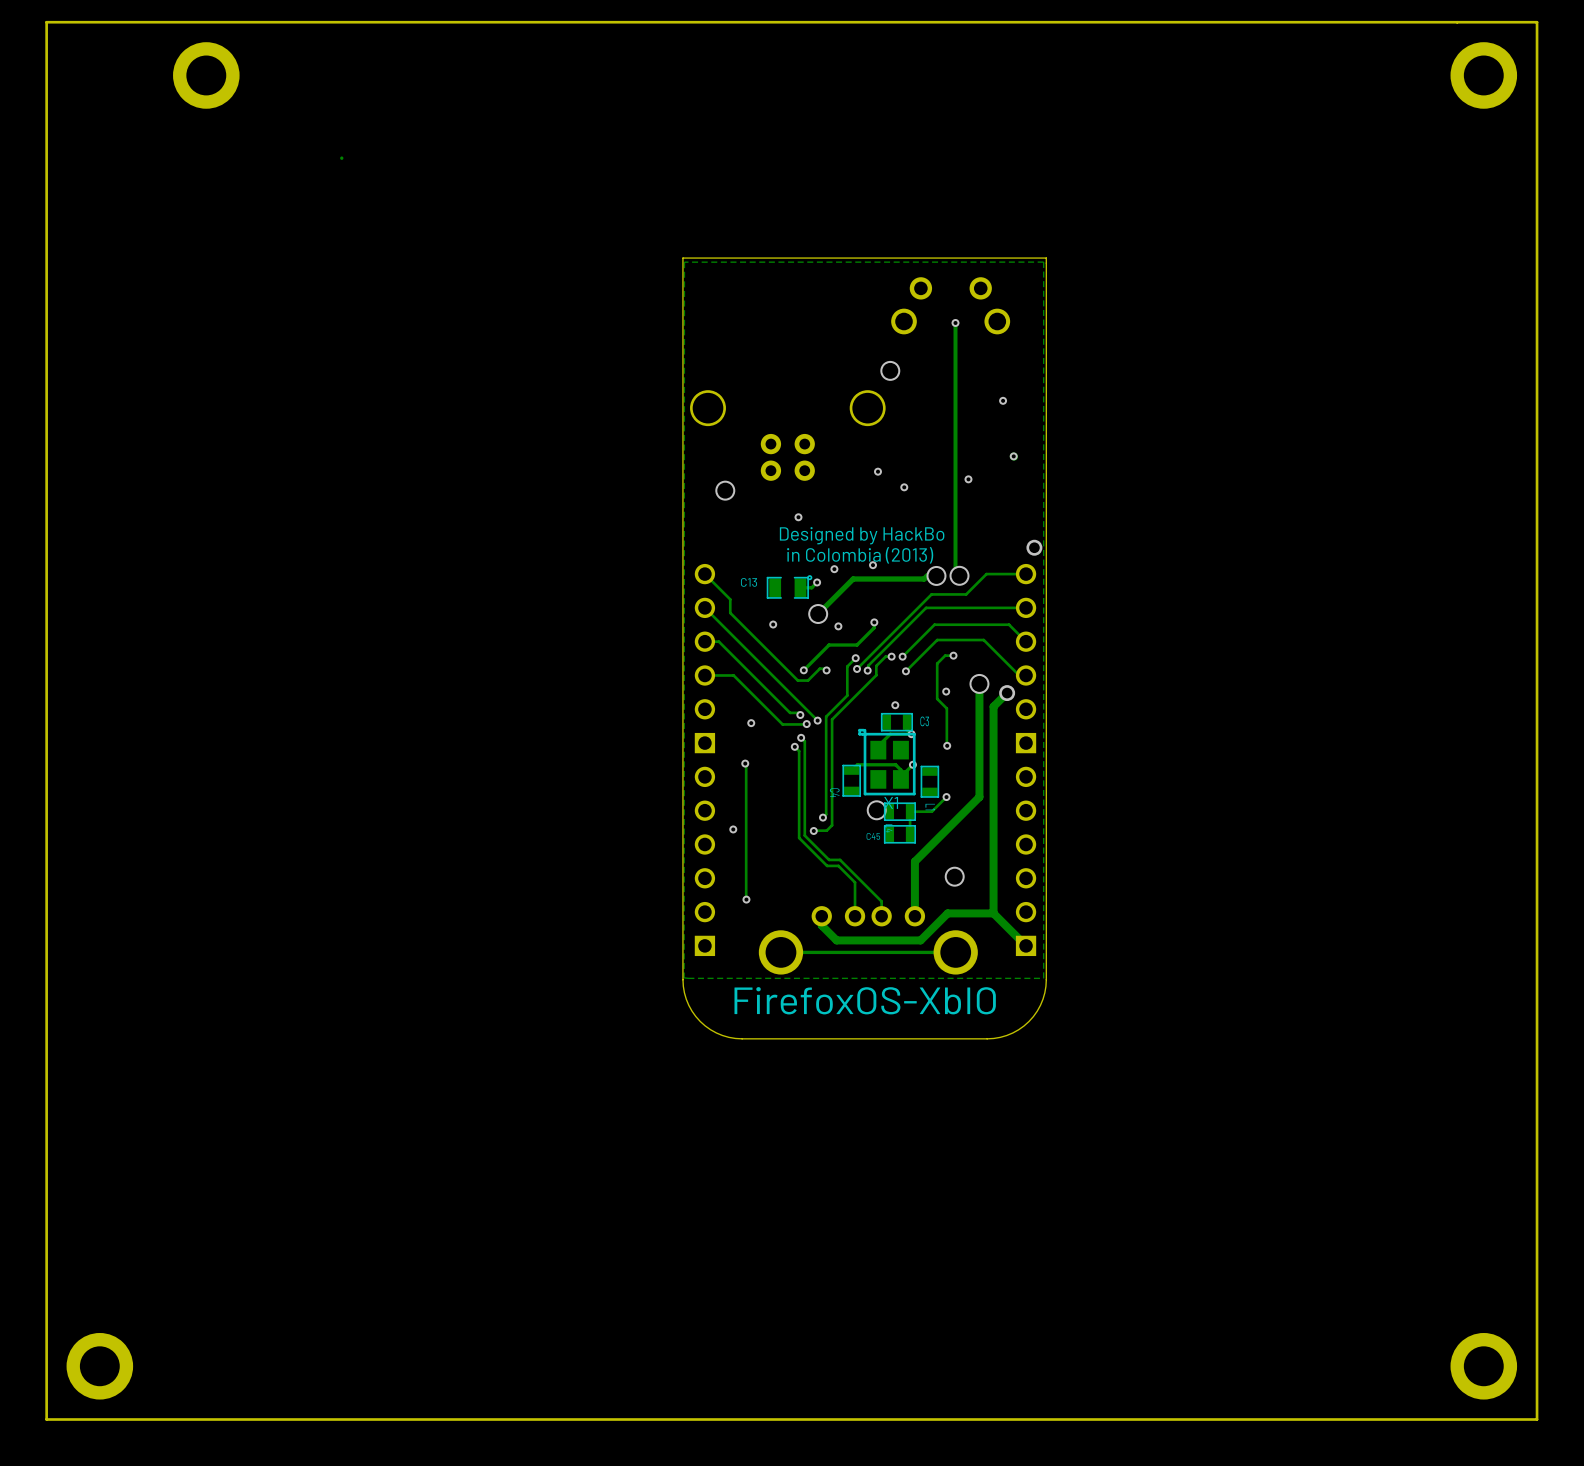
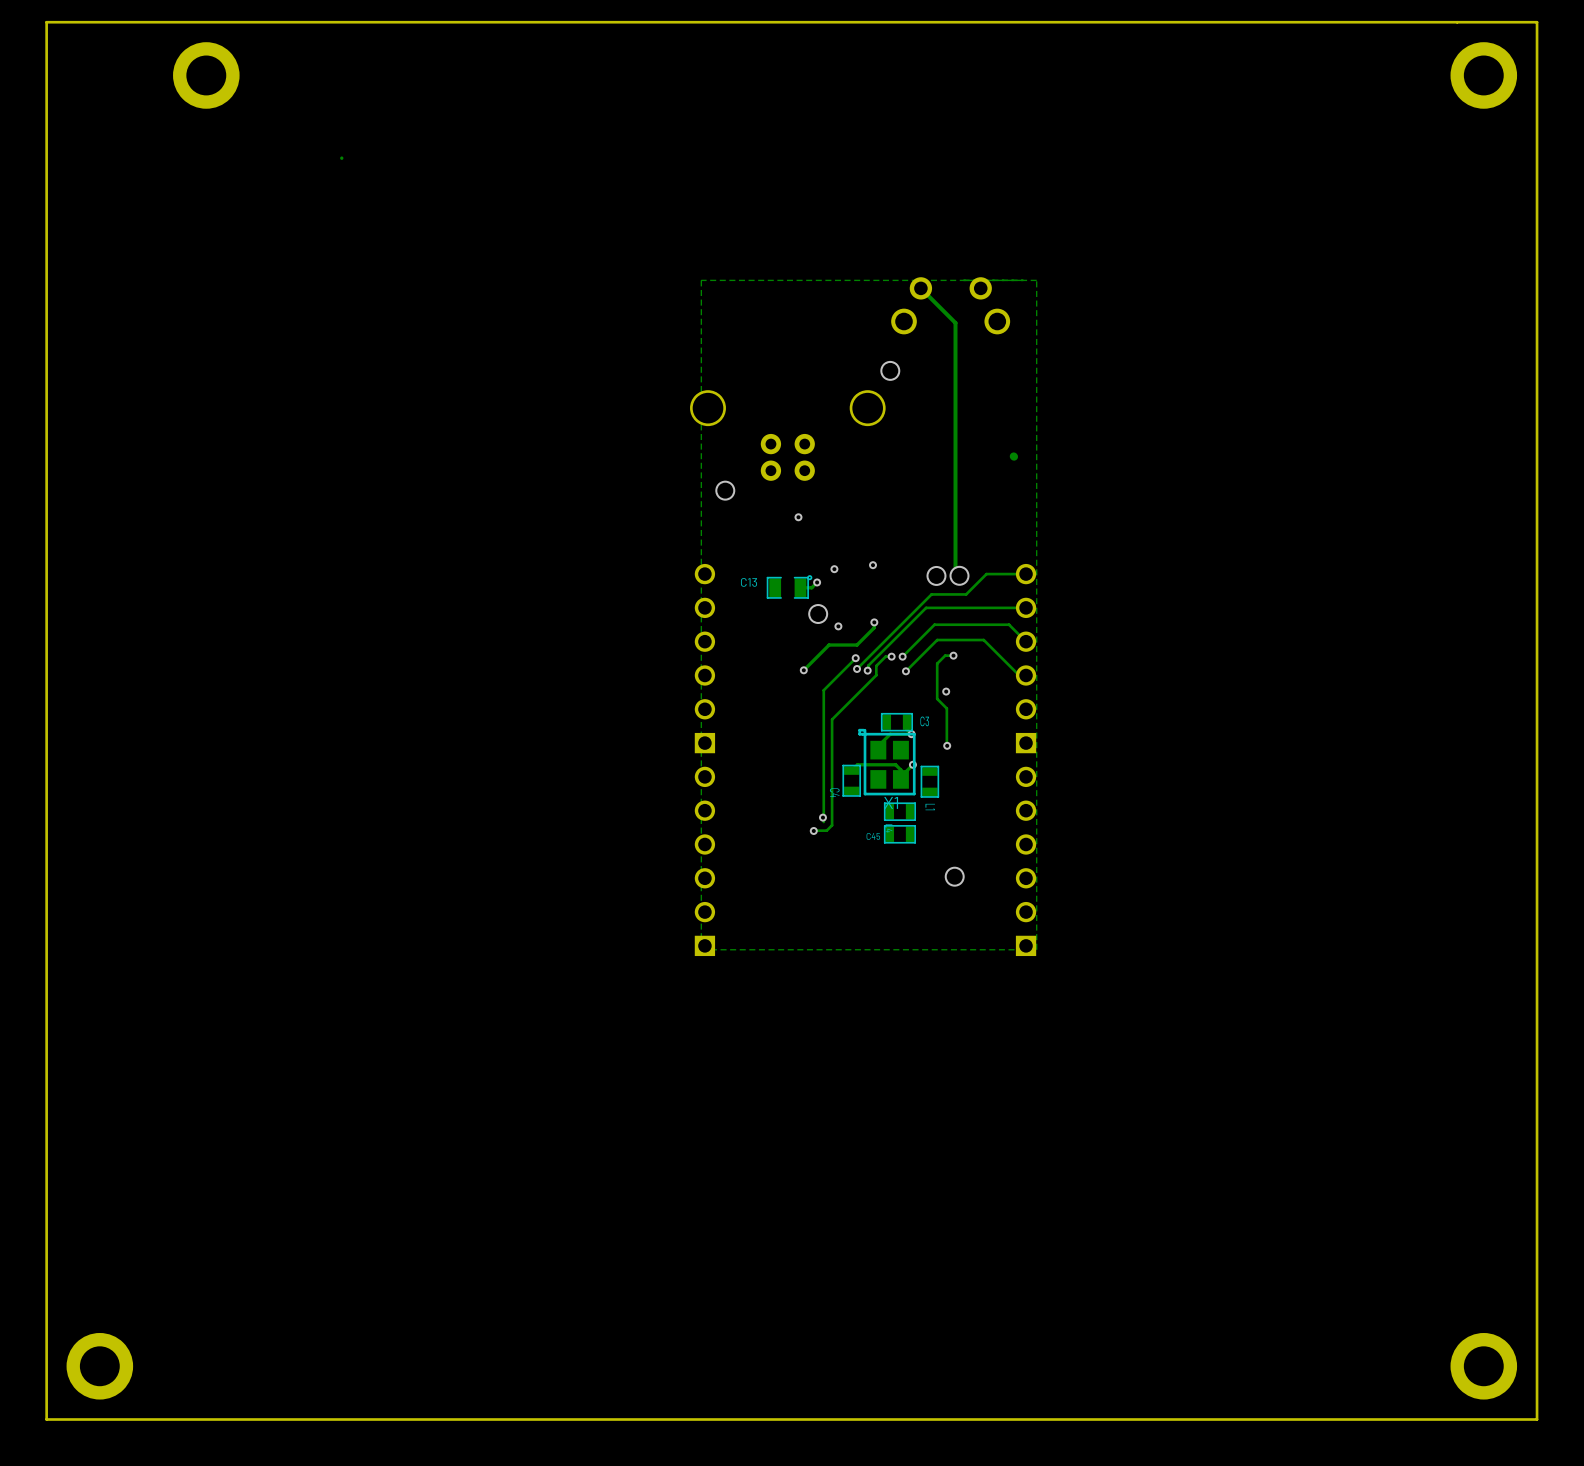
zone outline: (1043, 262) (1043, 978) (684, 977) (684, 262) (1043, 262) -> (1036, 280) (1036, 949) (701, 949) (701, 280) (1036, 280)
track: none -> (920, 288) (955, 322)
via: (955, 322) -> none
via: (1003, 400) -> none
via: (1013, 456) -> none
via: (877, 471) -> none
via: (968, 479) -> none
via: (904, 487) -> none
text: Designed by HackBo (862, 535) -> none
via: (1034, 547) -> none
text: in Colombia (2013) (860, 555) -> none
track: (704, 574) (730, 599) (730, 612) (797, 680) (808, 680) (819, 668) (826, 670) -> none
track: (936, 575) (927, 575) (924, 579) (853, 579) (818, 614) -> none
track: (704, 607) (817, 720) -> none
via: (773, 624) -> none
track: (704, 641) (718, 641) (790, 712) (798, 712) (800, 715) -> none
track: (855, 658) (847, 666) (847, 695) (826, 716) (826, 814) (822, 817) -> (855, 658) (823, 690) (823, 822)
via: (826, 670) -> none
track: (704, 675) (733, 675) (782, 724) (806, 724) -> none
track: (979, 683) (979, 797) (914, 861) (914, 916) -> none
via: (979, 683) -> none
track: (1007, 693) (993, 706) (993, 913) -> none
via: (1007, 693) -> none
via: (895, 705) -> none
via: (800, 715) -> none
via: (817, 720) -> none
via: (751, 723) -> none
via: (806, 724) -> none
track: (801, 737) (804, 741) (804, 835) (829, 859) (840, 859) (881, 901) (881, 916) -> none
via: (801, 737) -> none
track: (794, 746) (799, 751) (799, 837) (827, 865) (838, 865) (855, 882) (855, 916) -> none
via: (794, 746) -> none
track: (745, 763) (746, 899) -> none
via: (745, 763) -> none
track: (946, 797) (931, 811) (910, 811) (910, 834) -> none
via: (946, 797) -> none
via: (876, 810) -> none
via: (733, 829) -> none
via: (746, 899) -> none
track: (993, 913) (1026, 945) -> none
track: (993, 913) (947, 913) (920, 940) (836, 940) (821, 925) (821, 916) -> none
part: (868, 940) -> none
track: (955, 952) (780, 952) -> none
text: FirefoxOS-XbIO (865, 1000) -> none
board edge: (742, 1038) (993, 1038) (1006, 1035) (1024, 1025) (1033, 1016) (1042, 999) (1046, 979) (1046, 258) (682, 258) (683, 986) (692, 1011) (705, 1025) (722, 1035) (742, 1038) -> none

